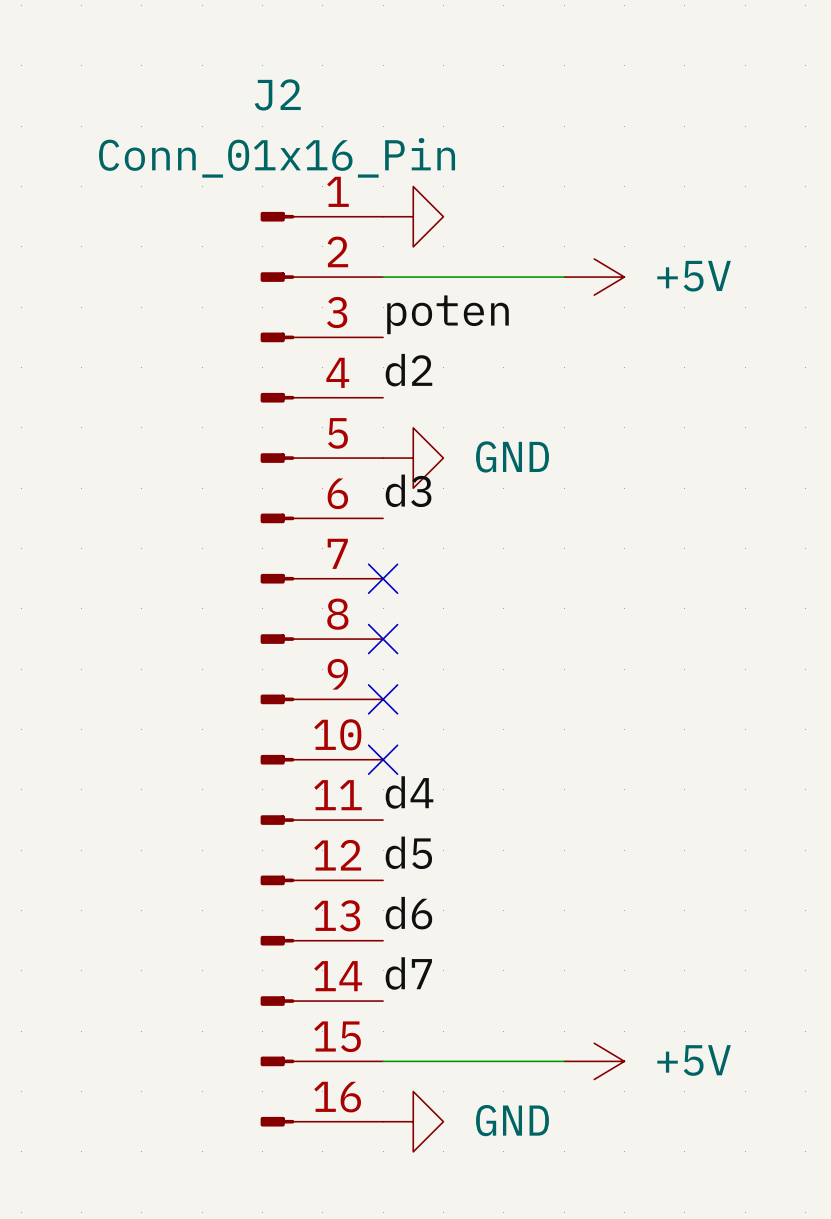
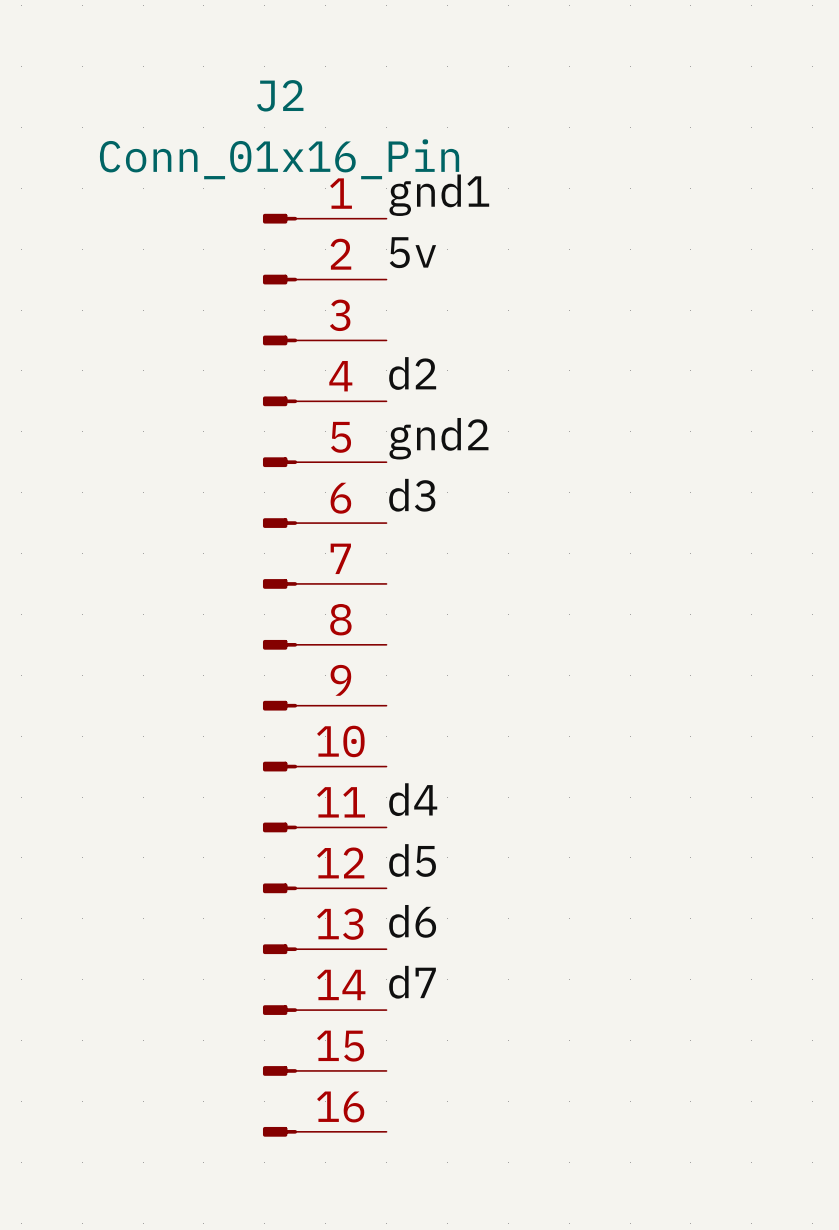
label: none -> gnd1 (439, 195)
power symbol: (413, 216) -> none
label: none -> 5v (412, 252)
wire: (383, 277) (564, 277) -> none
power symbol: +5V (594, 277) -> none
label: poten (447, 314) -> none
label: none -> gnd2 (438, 438)
power symbol: GND (413, 458) -> none
no-connect mark: (383, 578) -> none
no-connect mark: (383, 639) -> none
no-connect mark: (383, 699) -> none
no-connect mark: (383, 759) -> none
wire: (383, 1061) (564, 1061) -> none
power symbol: +5V (594, 1061) -> none
power symbol: GND (413, 1121) -> none

